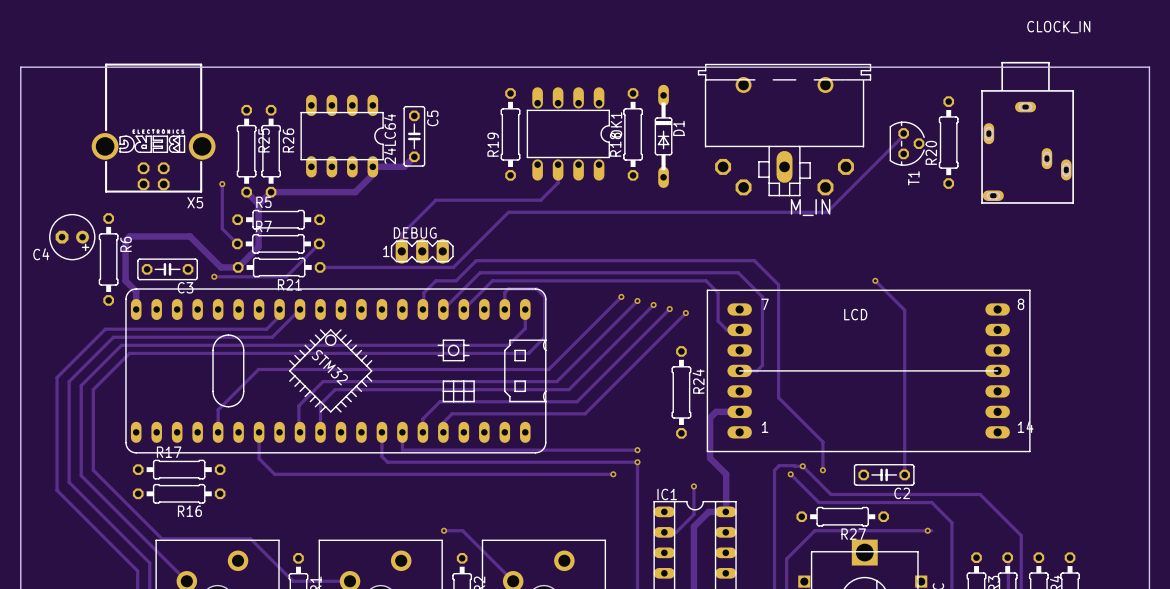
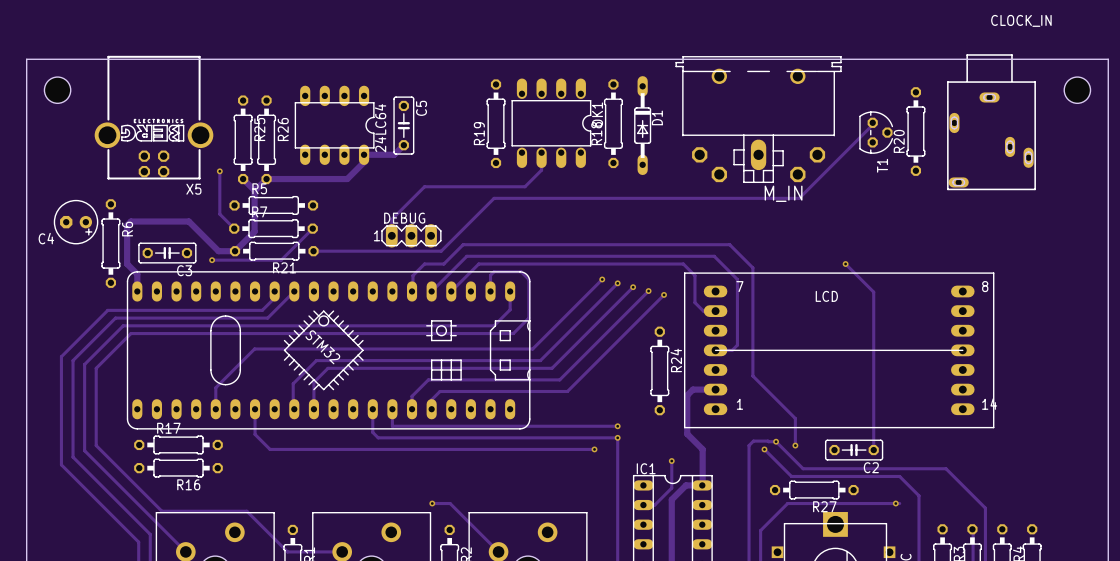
hole: none -> (57, 90)
hole: none -> (1077, 90)

